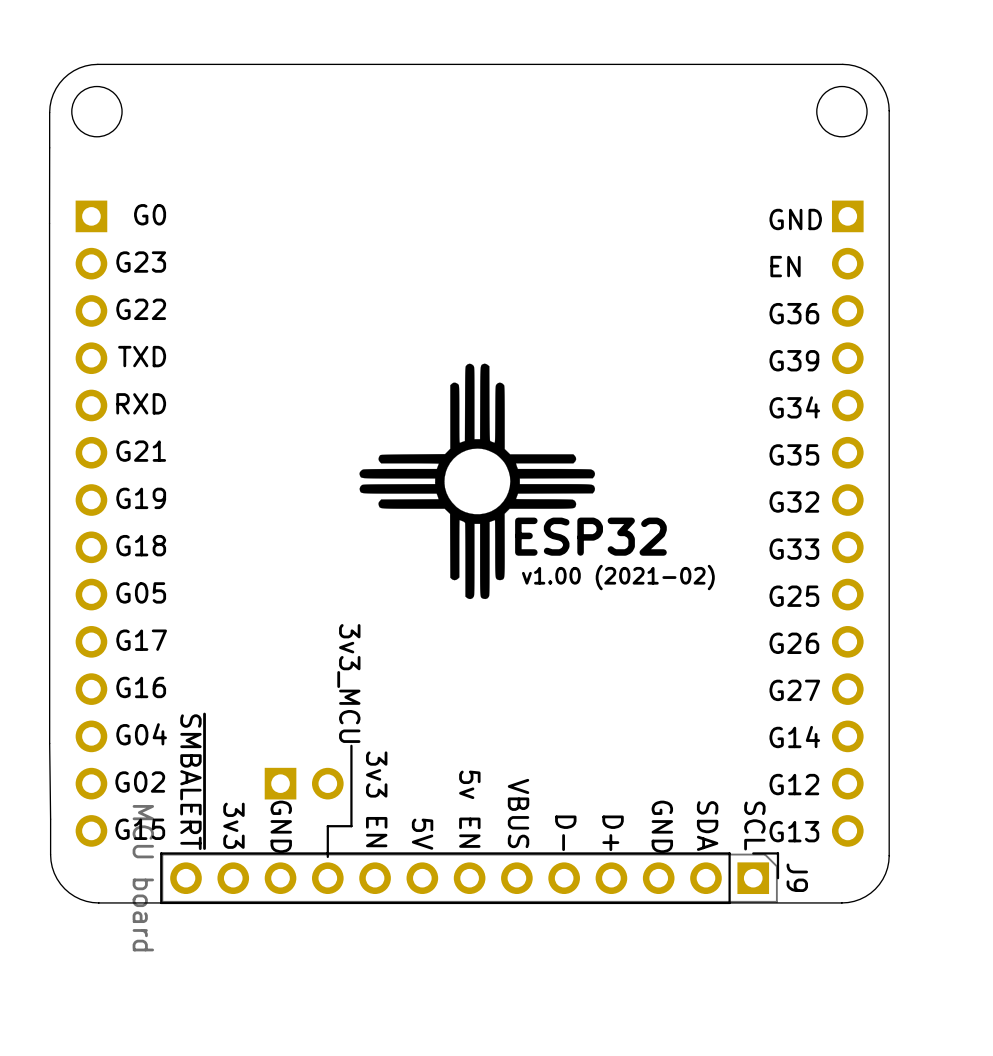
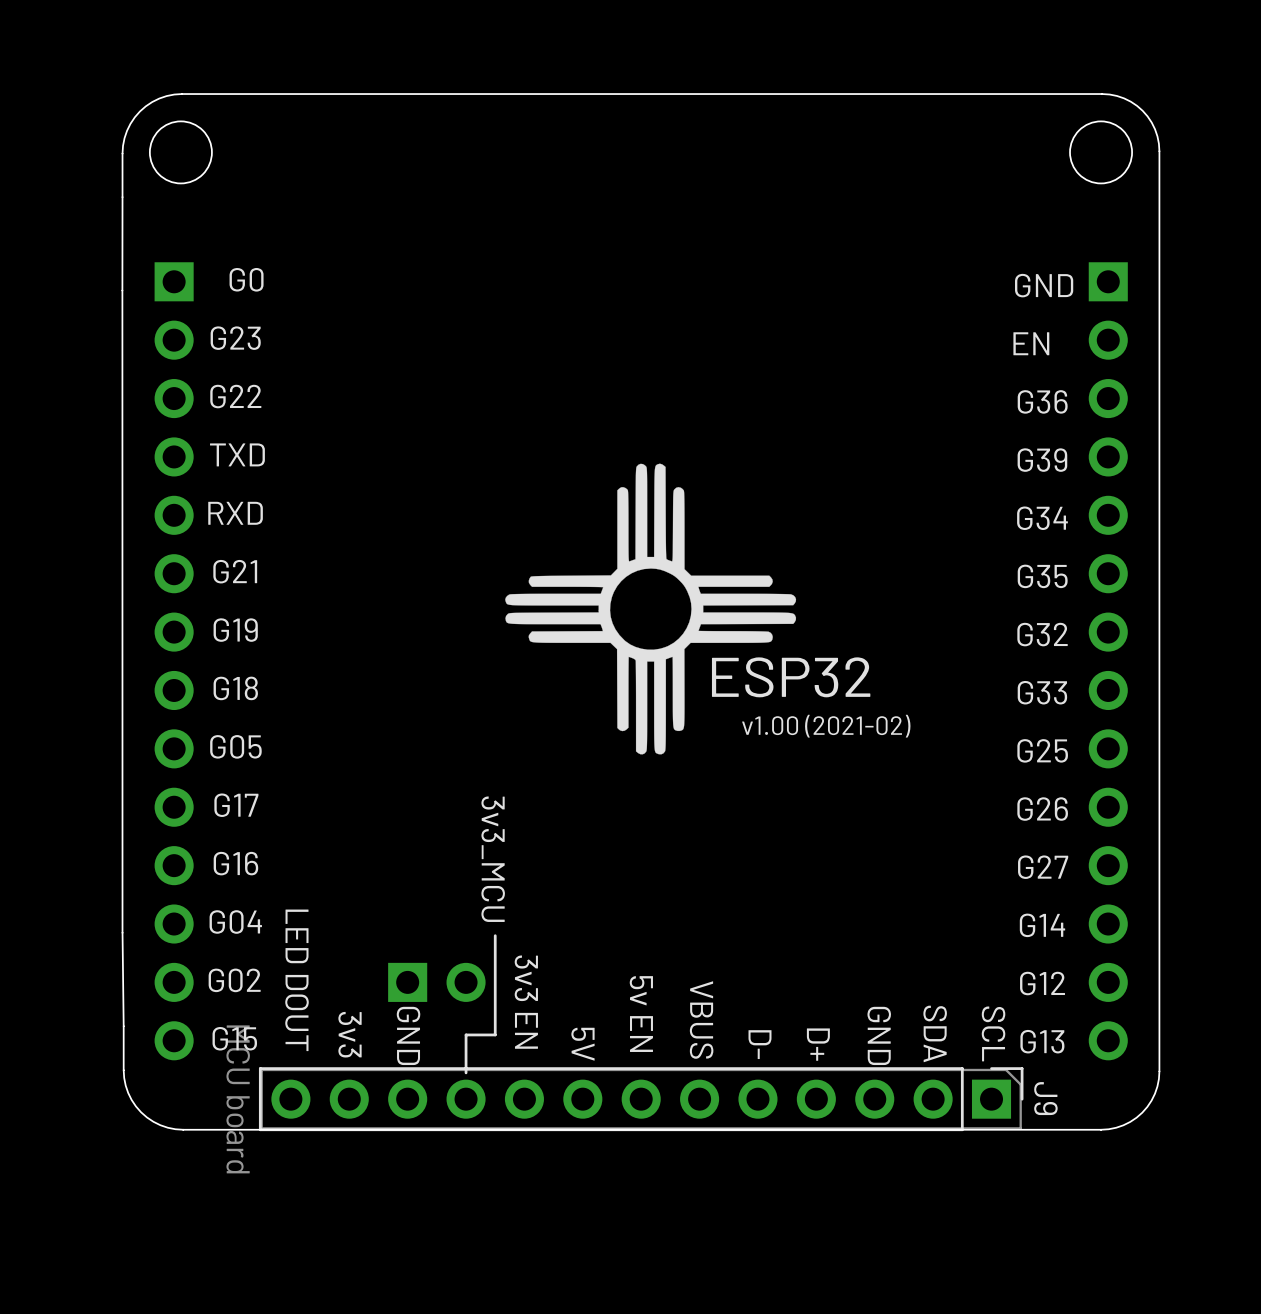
text: ~{SMBALERT} (193, 781) -> LED DOUT (297, 980)

